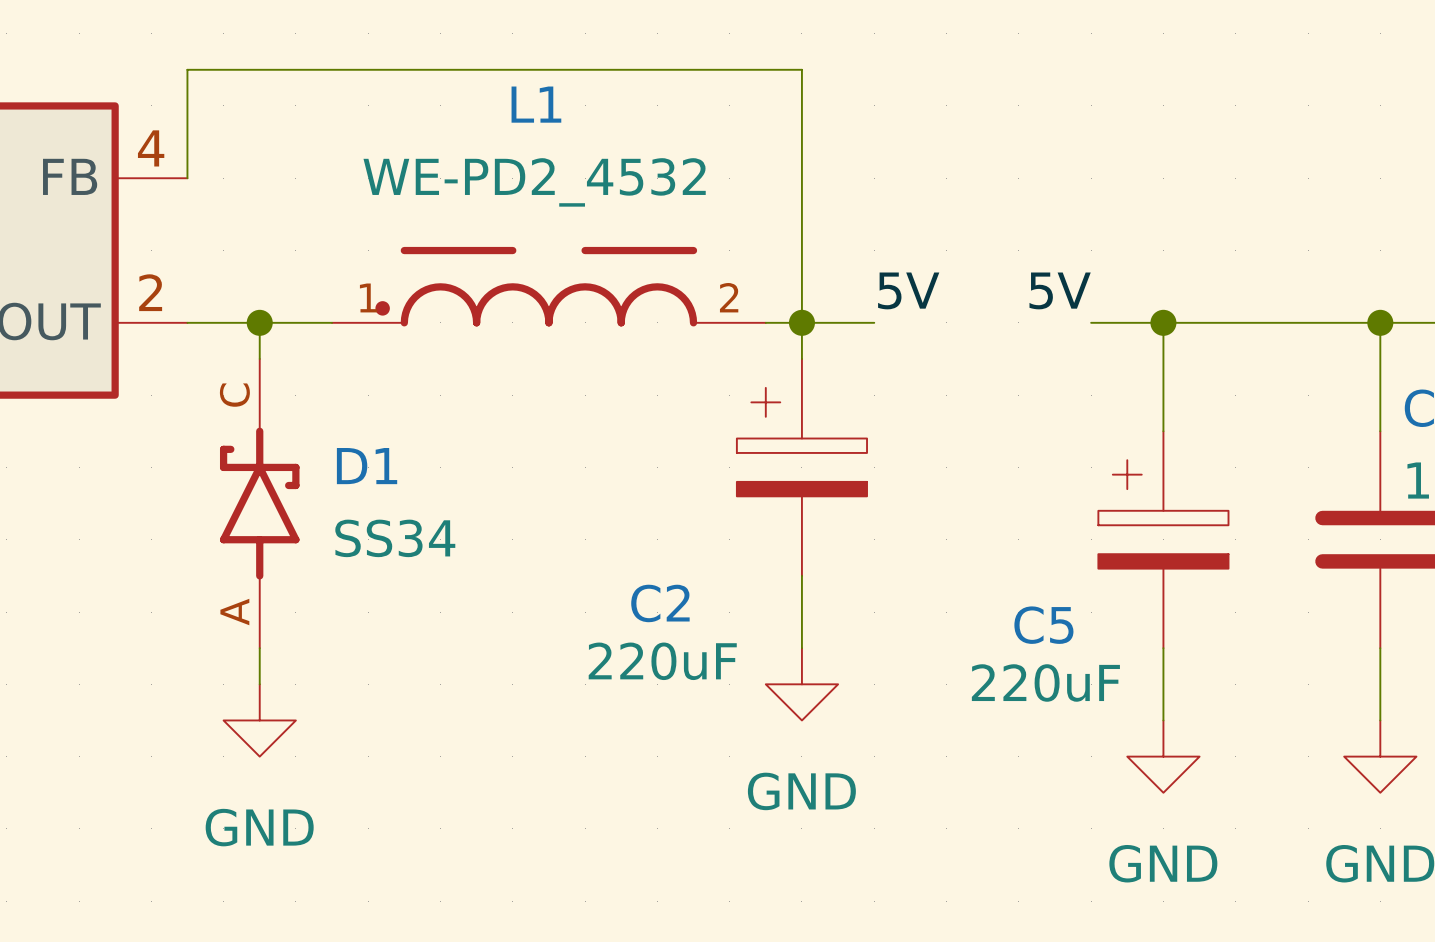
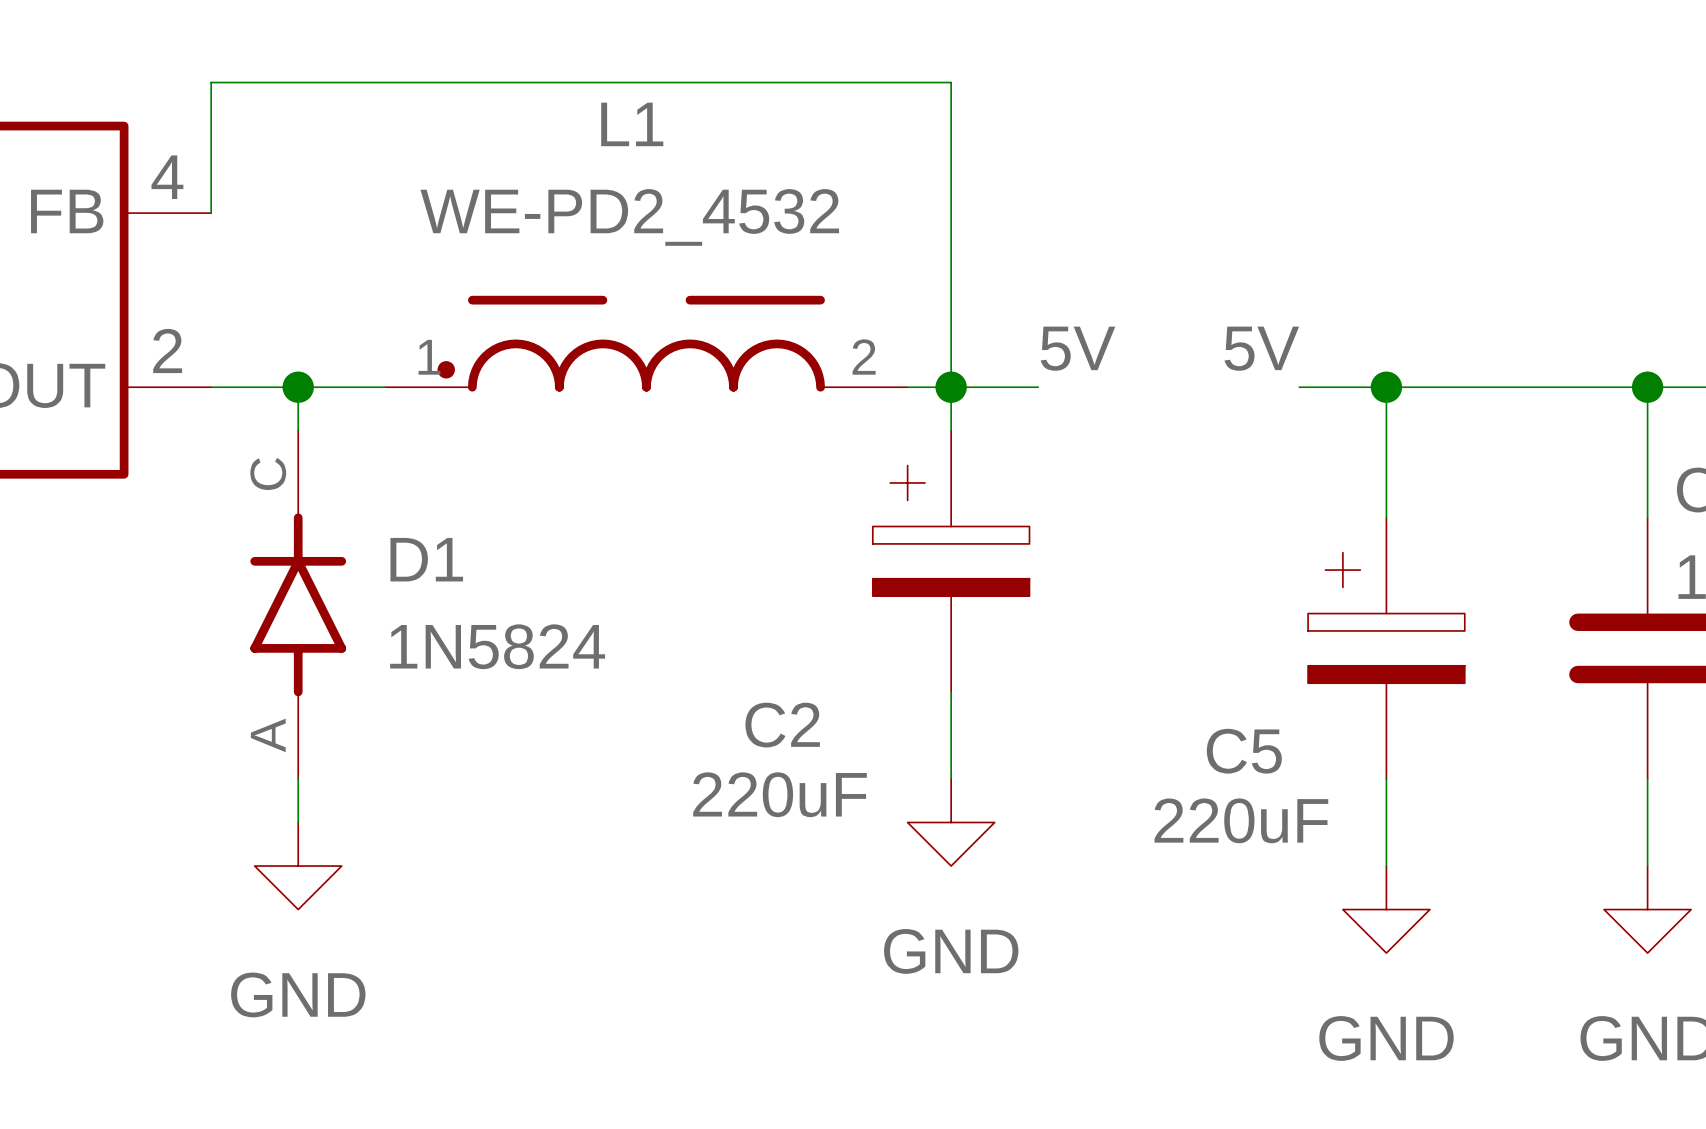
D1 symbol: [219, 358, 300, 649] -> [250, 430, 347, 779]
D1 value: SS34 (395, 538) -> 1N5824 (497, 646)

